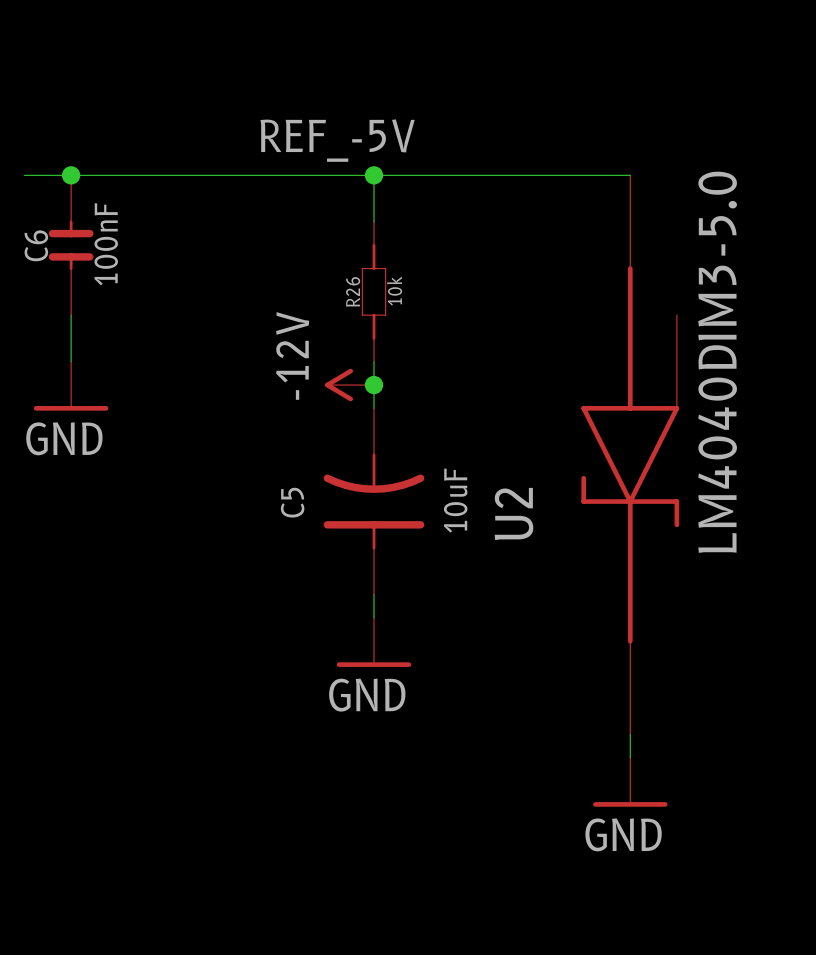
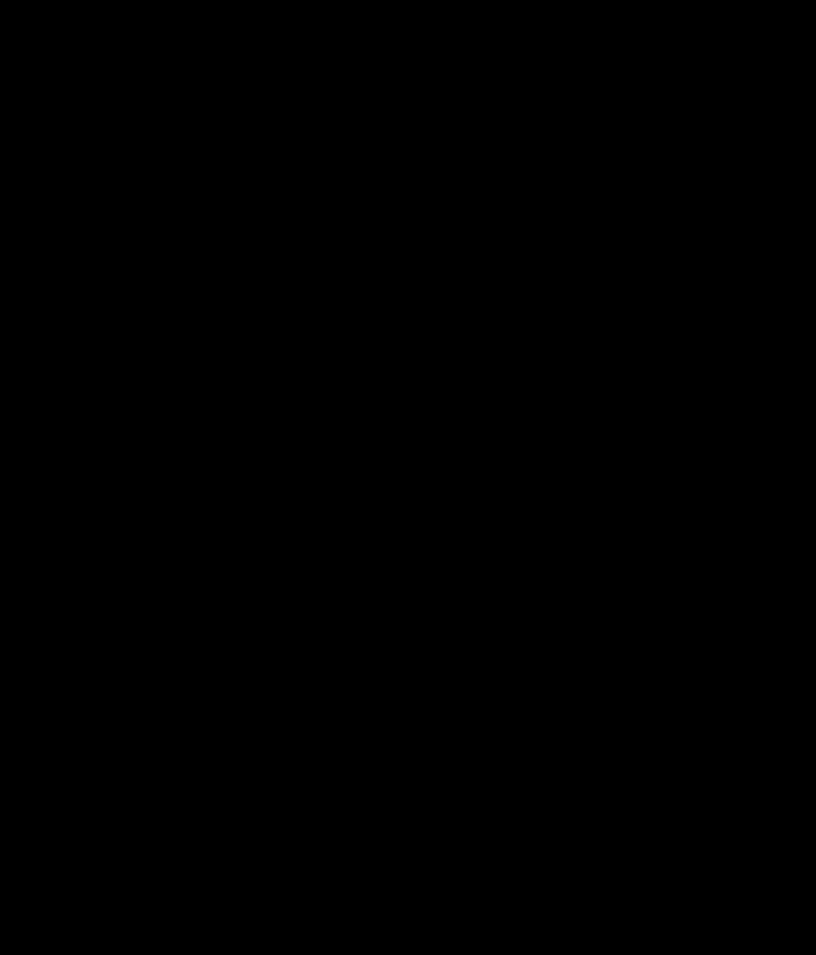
label: REF_-5V (337, 140) -> none
wire: (24, 175) (630, 175) -> none
junction: (71, 175) -> none
wire: (374, 175) (374, 221) -> none
junction: (374, 175) -> none
C6: 100nF (71, 245) -> none
R26: 10k (374, 291) -> none
wire: (71, 315) (71, 361) -> none
wire: (374, 361) (374, 408) -> none
power symbol: -12V (349, 385) -> none
junction: (374, 385) -> none
power symbol: GND (71, 386) -> none
U2: LM4040DIM3-5.0 (630, 454) -> none
C5: 10uF (374, 501) -> none
wire: (374, 594) (374, 618) -> none
power symbol: GND (374, 642) -> none
wire: (630, 734) (630, 757) -> none
power symbol: GND (630, 782) -> none

